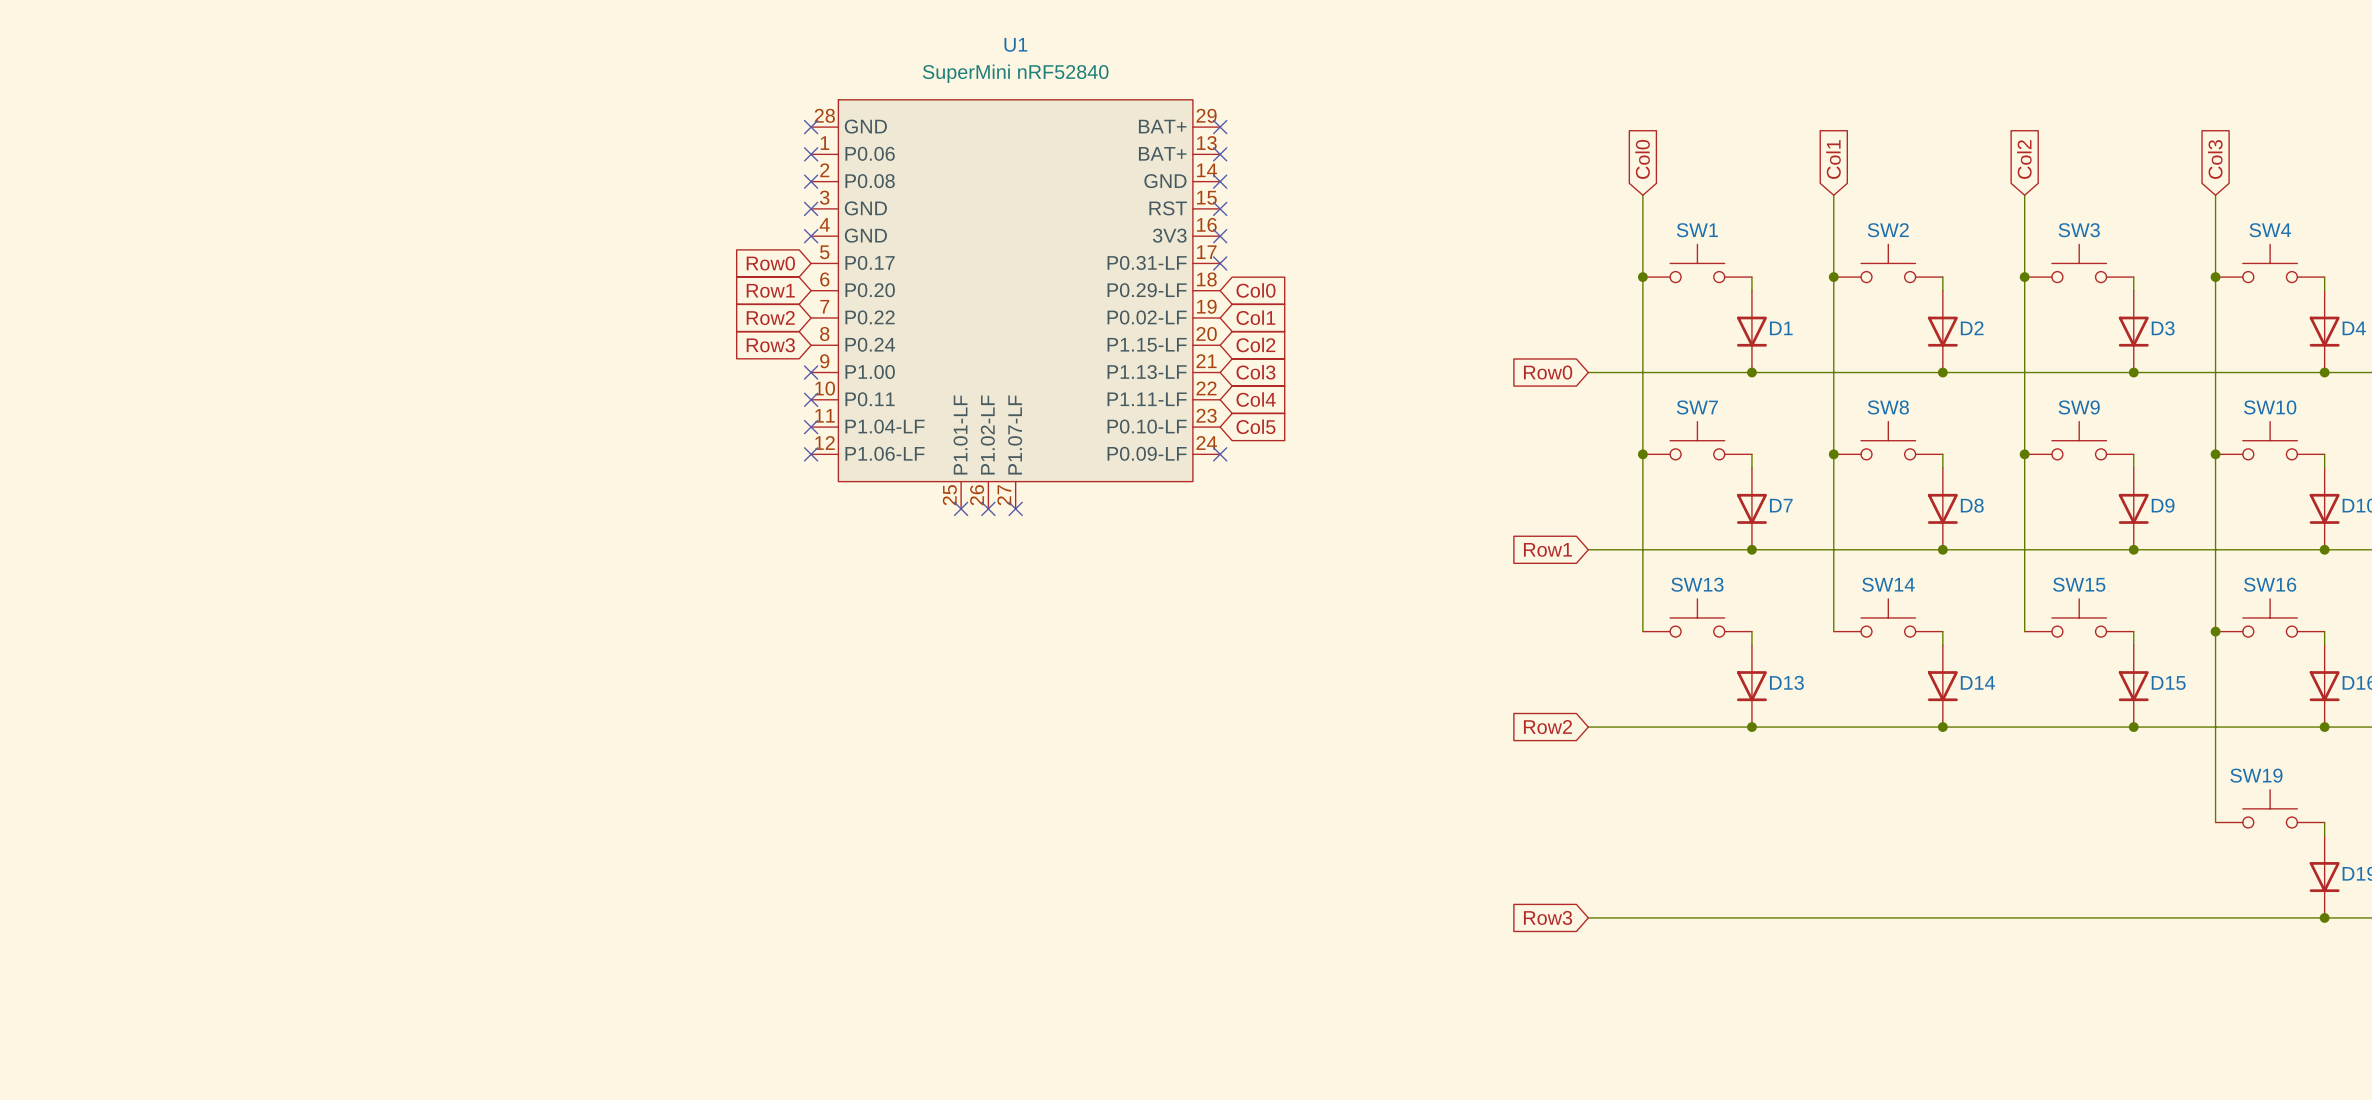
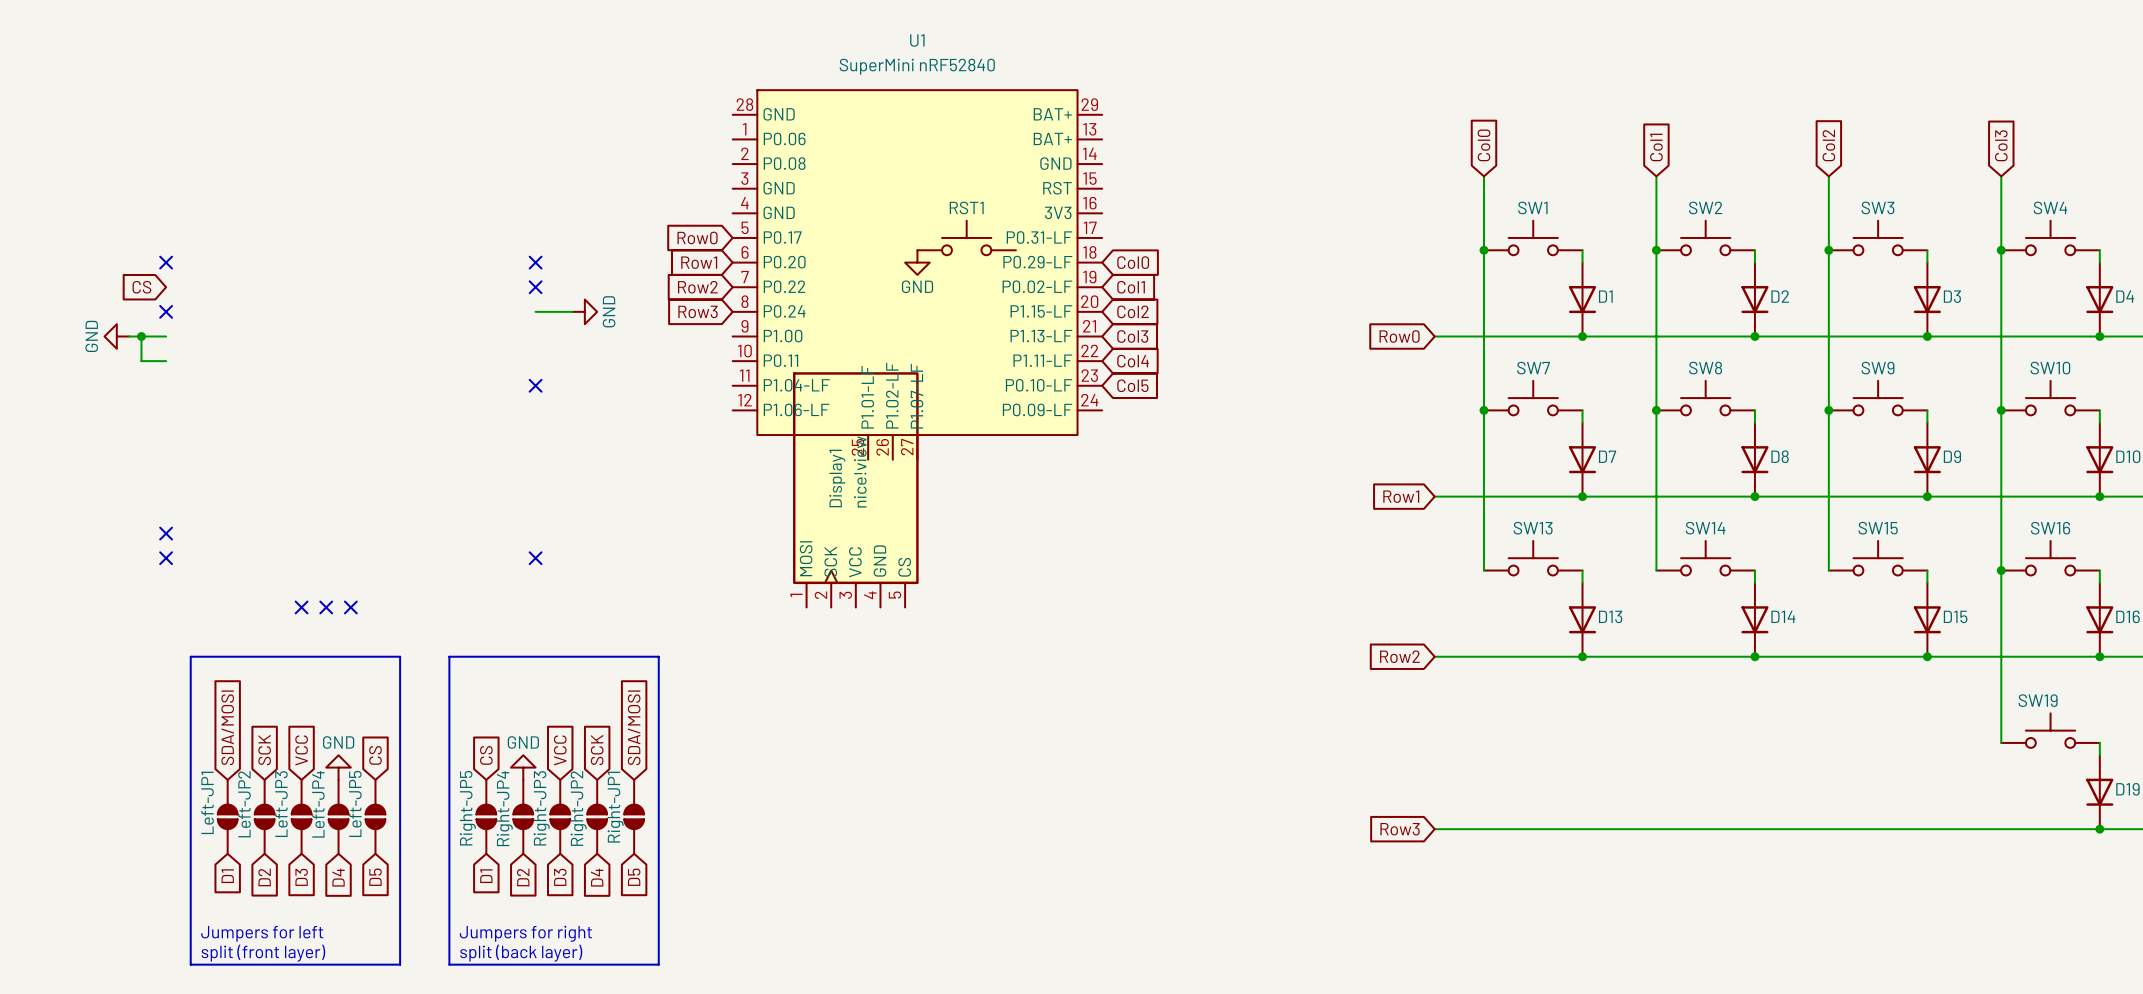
no-connect mark: (811, 127) -> none
no-connect mark: (1220, 127) -> none
no-connect mark: (811, 154) -> none
no-connect mark: (1220, 154) -> none
no-connect mark: (811, 181) -> none
no-connect mark: (1220, 181) -> none
no-connect mark: (811, 208) -> none
no-connect mark: (1220, 208) -> none
no-connect mark: (811, 236) -> none
no-connect mark: (1220, 236) -> none
RST1: none -> (966, 237)
no-connect mark: (1220, 263) -> none
no-connect mark: none -> (166, 262)
no-connect mark: none -> (535, 262)
power symbol: none -> GND (917, 262)
global label: none -> CS (141, 287)
no-connect mark: none -> (535, 287)
no-connect mark: none -> (166, 311)
wire: none -> (535, 311) (572, 311)
power symbol: none -> GND (584, 311)
power symbol: none -> GND (116, 336)
wire: none -> (129, 336) (166, 336)
wire: none -> (141, 336) (141, 361) (166, 361)
junction: none -> (141, 336)
no-connect mark: (811, 372) -> none
no-connect mark: (811, 399) -> none
no-connect mark: none -> (535, 385)
no-connect mark: (811, 427) -> none
no-connect mark: (811, 454) -> none
no-connect mark: (1220, 454) -> none
no-connect mark: (961, 508) -> none
no-connect mark: (988, 508) -> none
no-connect mark: (1015, 508) -> none
Display1: none -> nice!view (855, 489)
no-connect mark: none -> (166, 533)
no-connect mark: none -> (166, 558)
no-connect mark: none -> (535, 558)
no-connect mark: none -> (301, 607)
no-connect mark: none -> (326, 607)
no-connect mark: none -> (350, 607)
line: none -> (190, 656) (400, 656) (400, 964) (190, 964) (190, 656)
line: none -> (449, 656) (658, 656) (658, 964) (449, 964) (449, 656)
global label: none -> SDA/MOSI (227, 727)
global label: none -> SDA/MOSI (634, 727)
global label: none -> SCK (264, 749)
global label: none -> VCC (301, 750)
global label: none -> VCC (560, 750)
global label: none -> SCK (597, 749)
global label: none -> CS (375, 755)
global label: none -> CS (486, 755)
power symbol: none -> GND (338, 767)
power symbol: none -> GND (523, 767)
Left-JP1: none -> (227, 816)
Left-JP2: none -> (264, 816)
Left-JP3: none -> (301, 816)
Left-JP4: none -> (338, 816)
Left-JP5: none -> (375, 816)
Right-JP5: none -> (486, 816)
Right-JP4: none -> (523, 816)
Right-JP3: none -> (560, 816)
Right-JP2: none -> (597, 816)
Right-JP1: none -> (634, 816)
global label: none -> D1 (227, 876)
global label: none -> D2 (264, 877)
global label: none -> D3 (301, 877)
global label: none -> D4 (338, 877)
global label: none -> D5 (375, 877)
global label: none -> D1 (486, 876)
global label: none -> D2 (523, 877)
global label: none -> D3 (560, 877)
global label: none -> D4 (597, 877)
global label: none -> D5 (634, 877)
text: none -> Jumpers for left (262, 933)
text: none -> Jumpers for right (525, 933)
text: none -> split (front layer) (263, 953)
text: none -> split (back layer) (521, 953)

